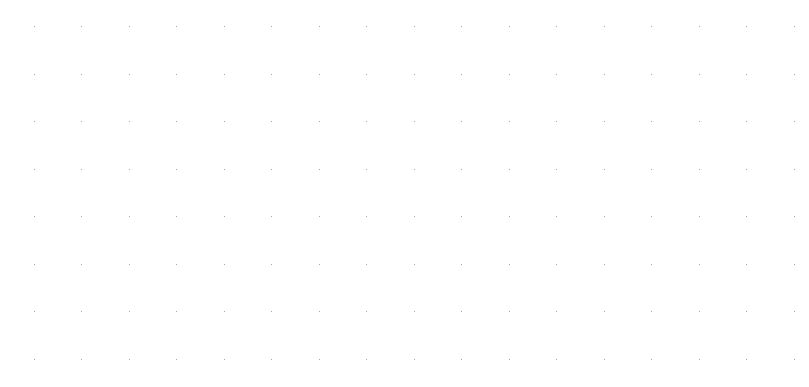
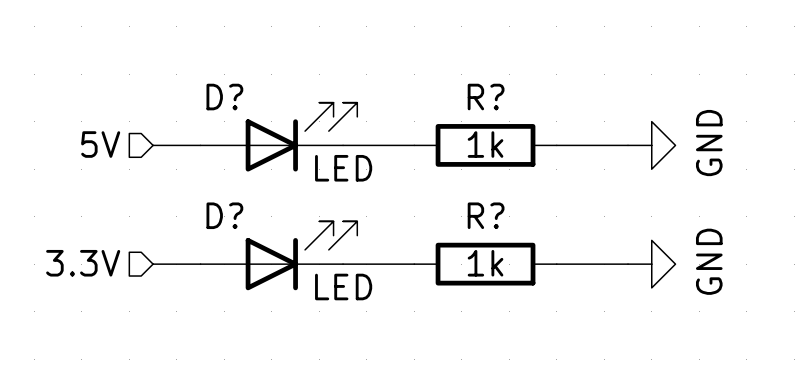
D?: none -> LED (278, 137)
hierarchical label: none -> 5V (100, 144)
wire: none -> (153, 145) (200, 145)
wire: none -> (343, 145) (414, 145)
R?: none -> 1k (485, 145)
wire: none -> (556, 145) (628, 145)
power symbol: none -> GND (651, 145)
D?: none -> LED (278, 255)
hierarchical label: none -> 3.3V (83, 263)
wire: none -> (153, 264) (200, 264)
wire: none -> (343, 264) (414, 264)
R?: none -> 1k (485, 264)
wire: none -> (556, 264) (628, 264)
power symbol: none -> GND (651, 264)

